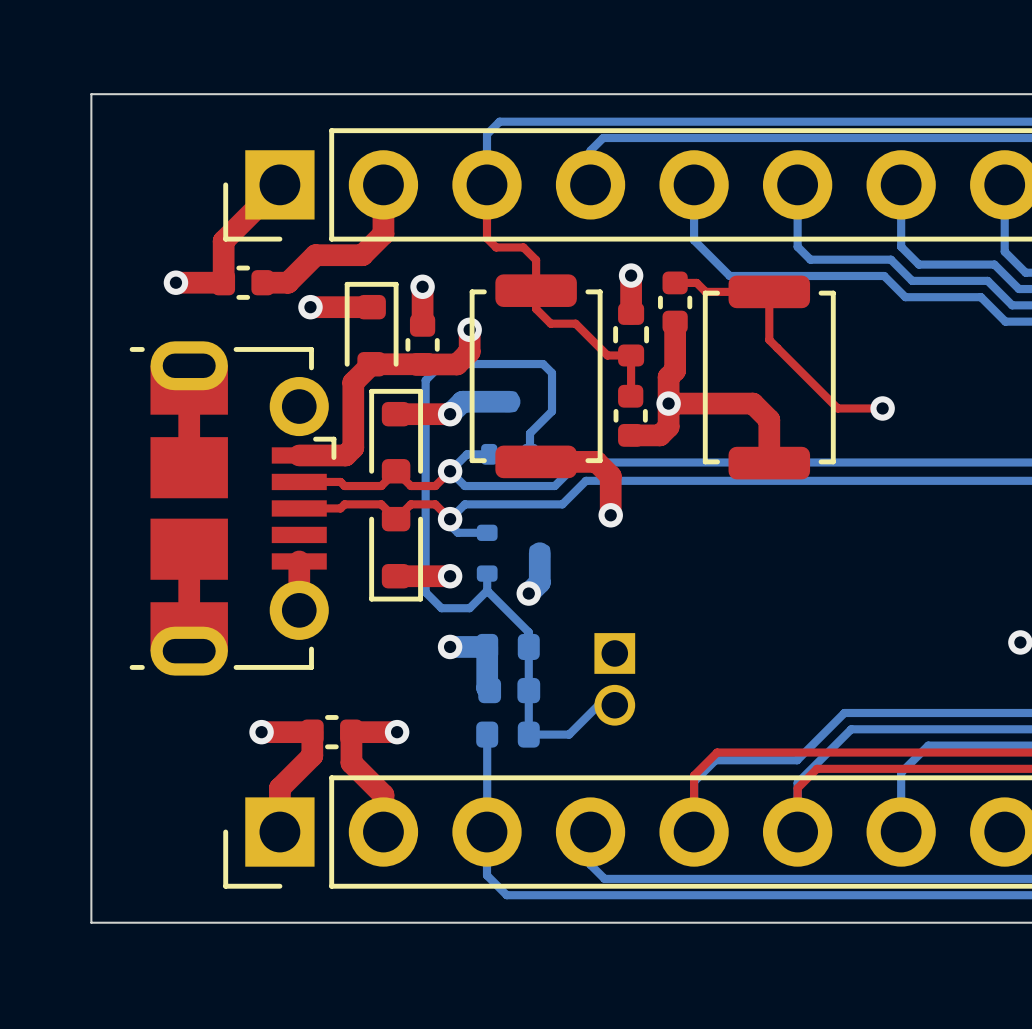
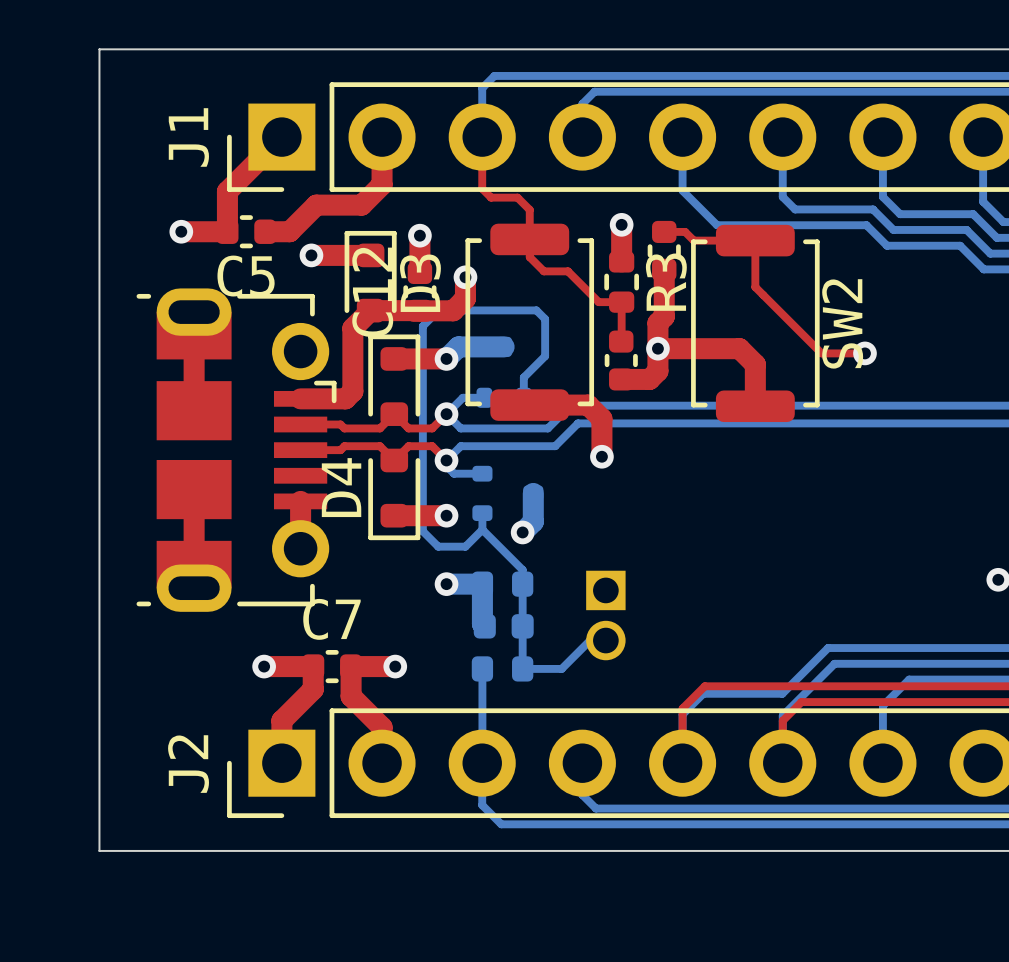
J1 name: none -> J1 (188, 137)
C5 name: none -> C5 (246, 276)
R3 name: none -> R3 (666, 282)
D3 name: none -> D3 (420, 283)
C12 name: none -> C12 (372, 292)
SW2 name: none -> SW2 (842, 323)
D4 name: none -> D4 (341, 487)
C7 name: none -> C7 (331, 619)
J2 name: none -> J2 (188, 764)

